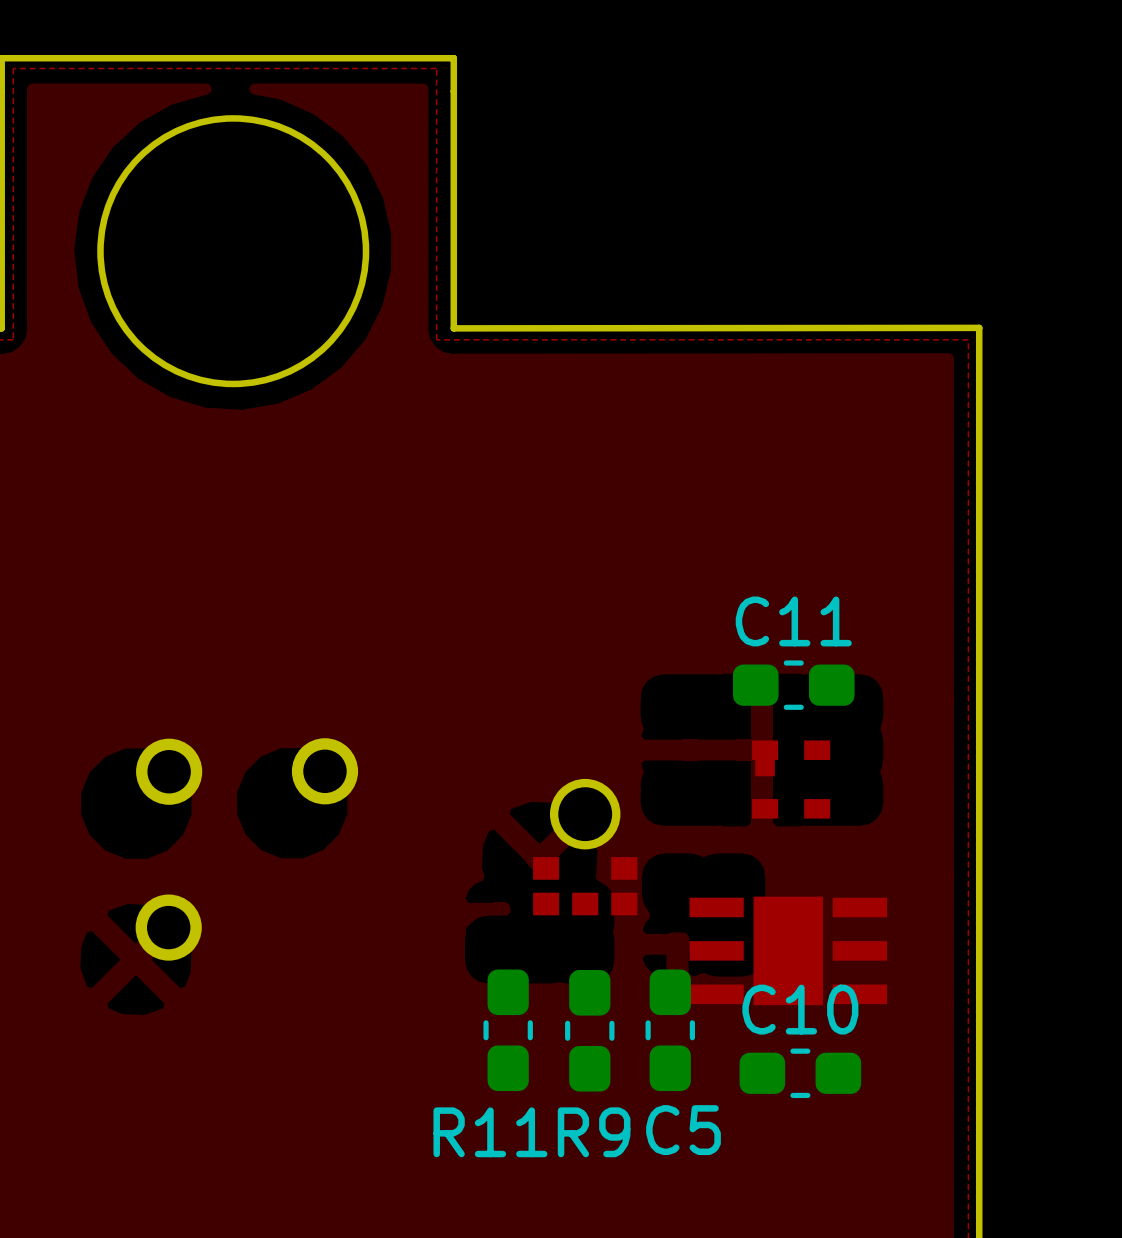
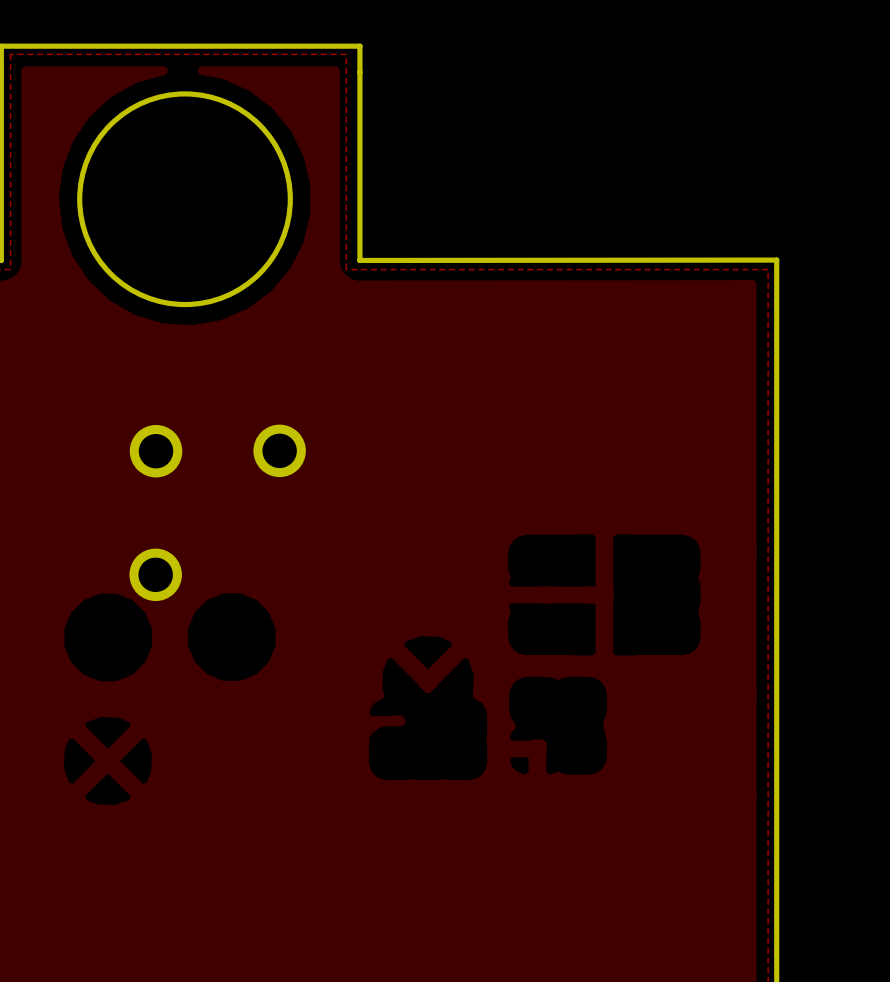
C11: (793, 685) -> none
part: (791, 779) -> none
part: (585, 847) -> none
part position: (246, 849) -> (217, 512)
part: (788, 950) -> none
R11: (508, 1030) -> none
R9: (589, 1030) -> none
C5: (670, 1030) -> none
C10: (800, 1073) -> none

